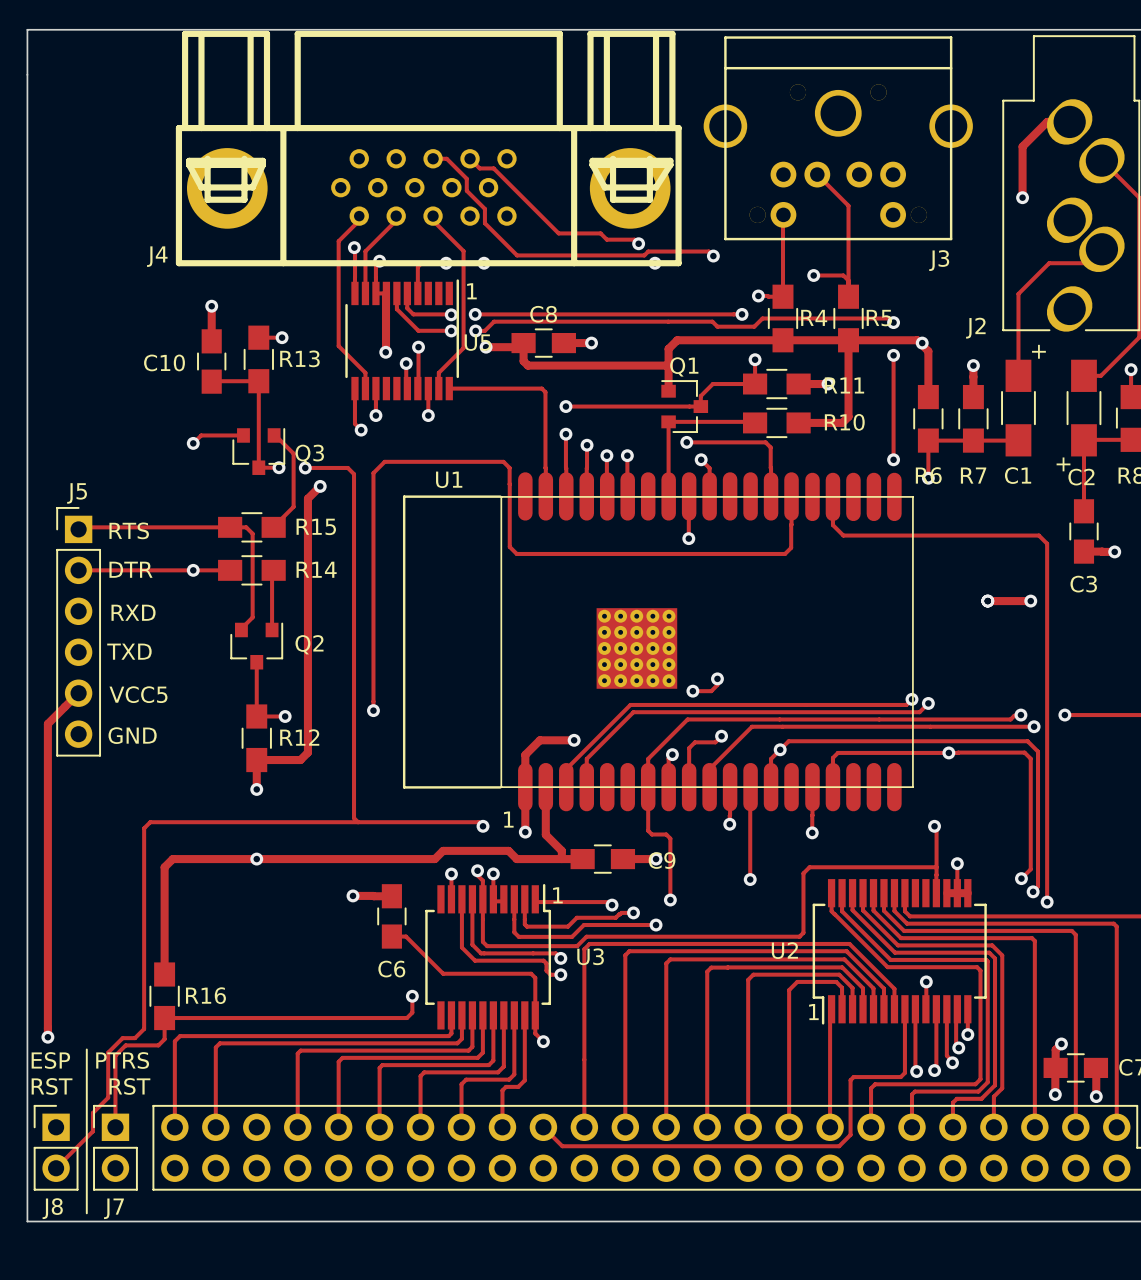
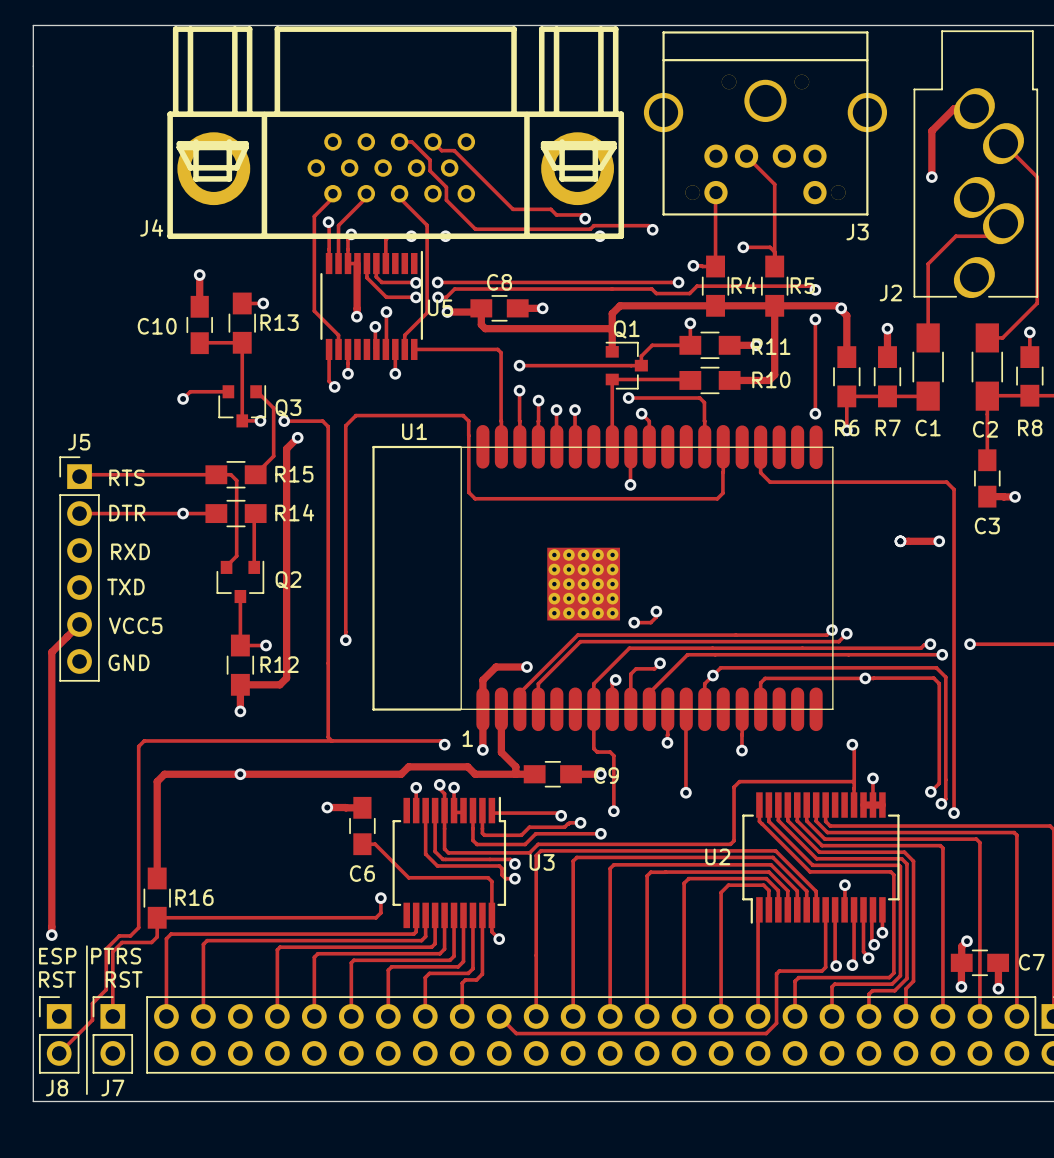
text: 1 (471, 291) -> none
text: + (1038, 351) -> none
text: + (1063, 464) -> none
text: 1 (557, 895) -> none
text: 1 (813, 1012) -> none

